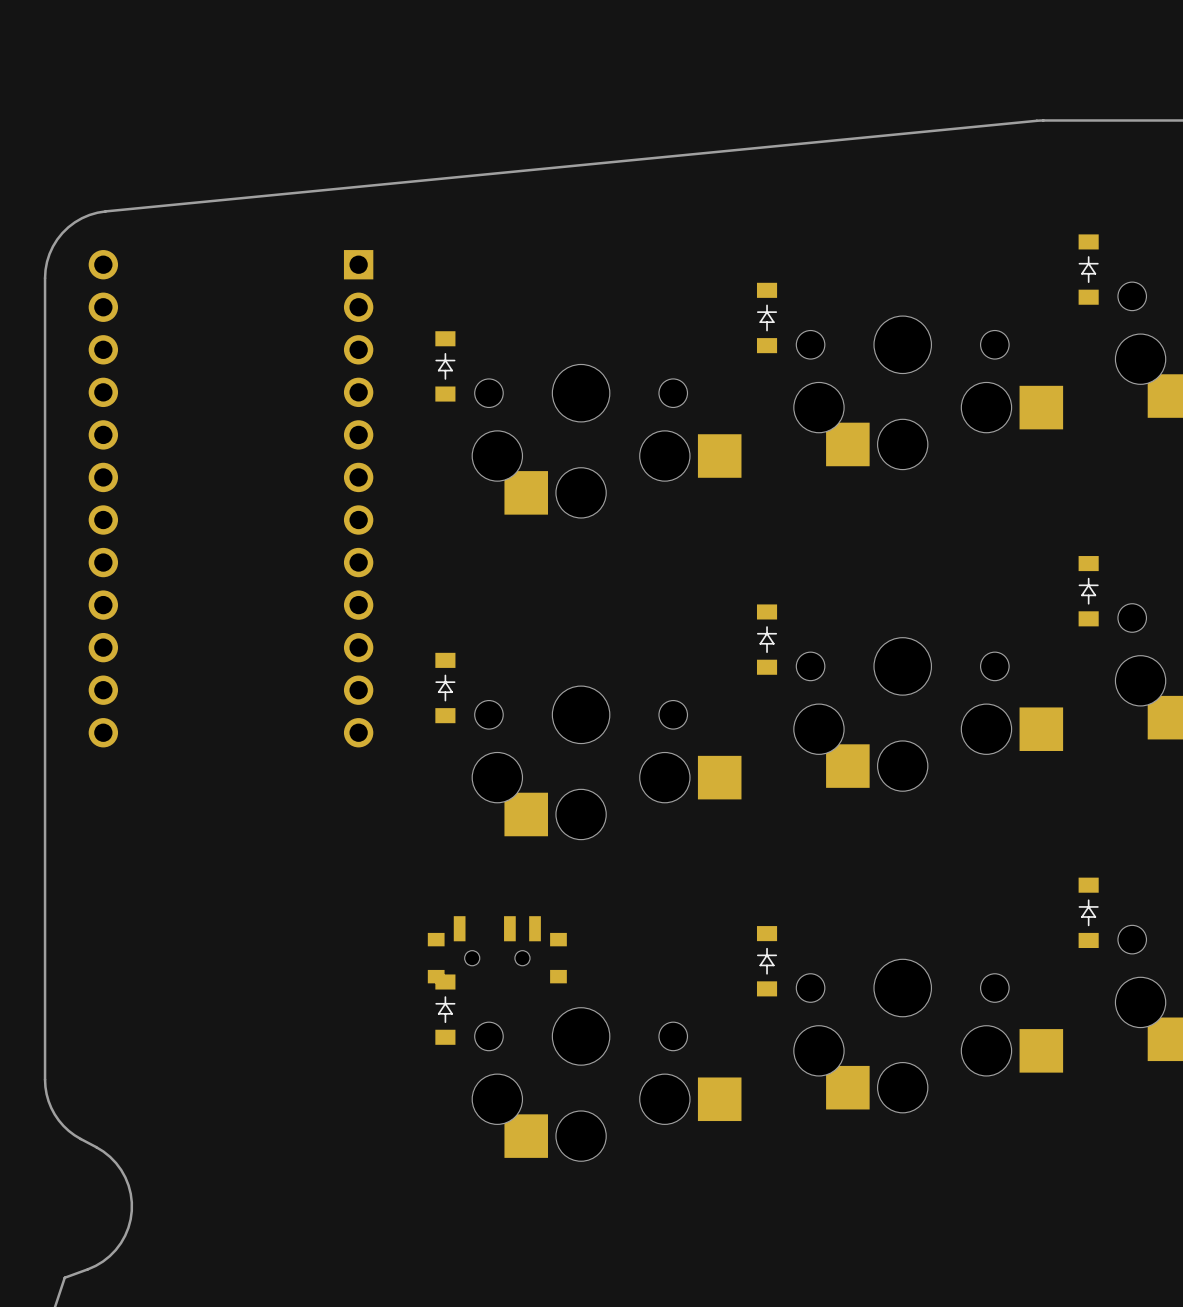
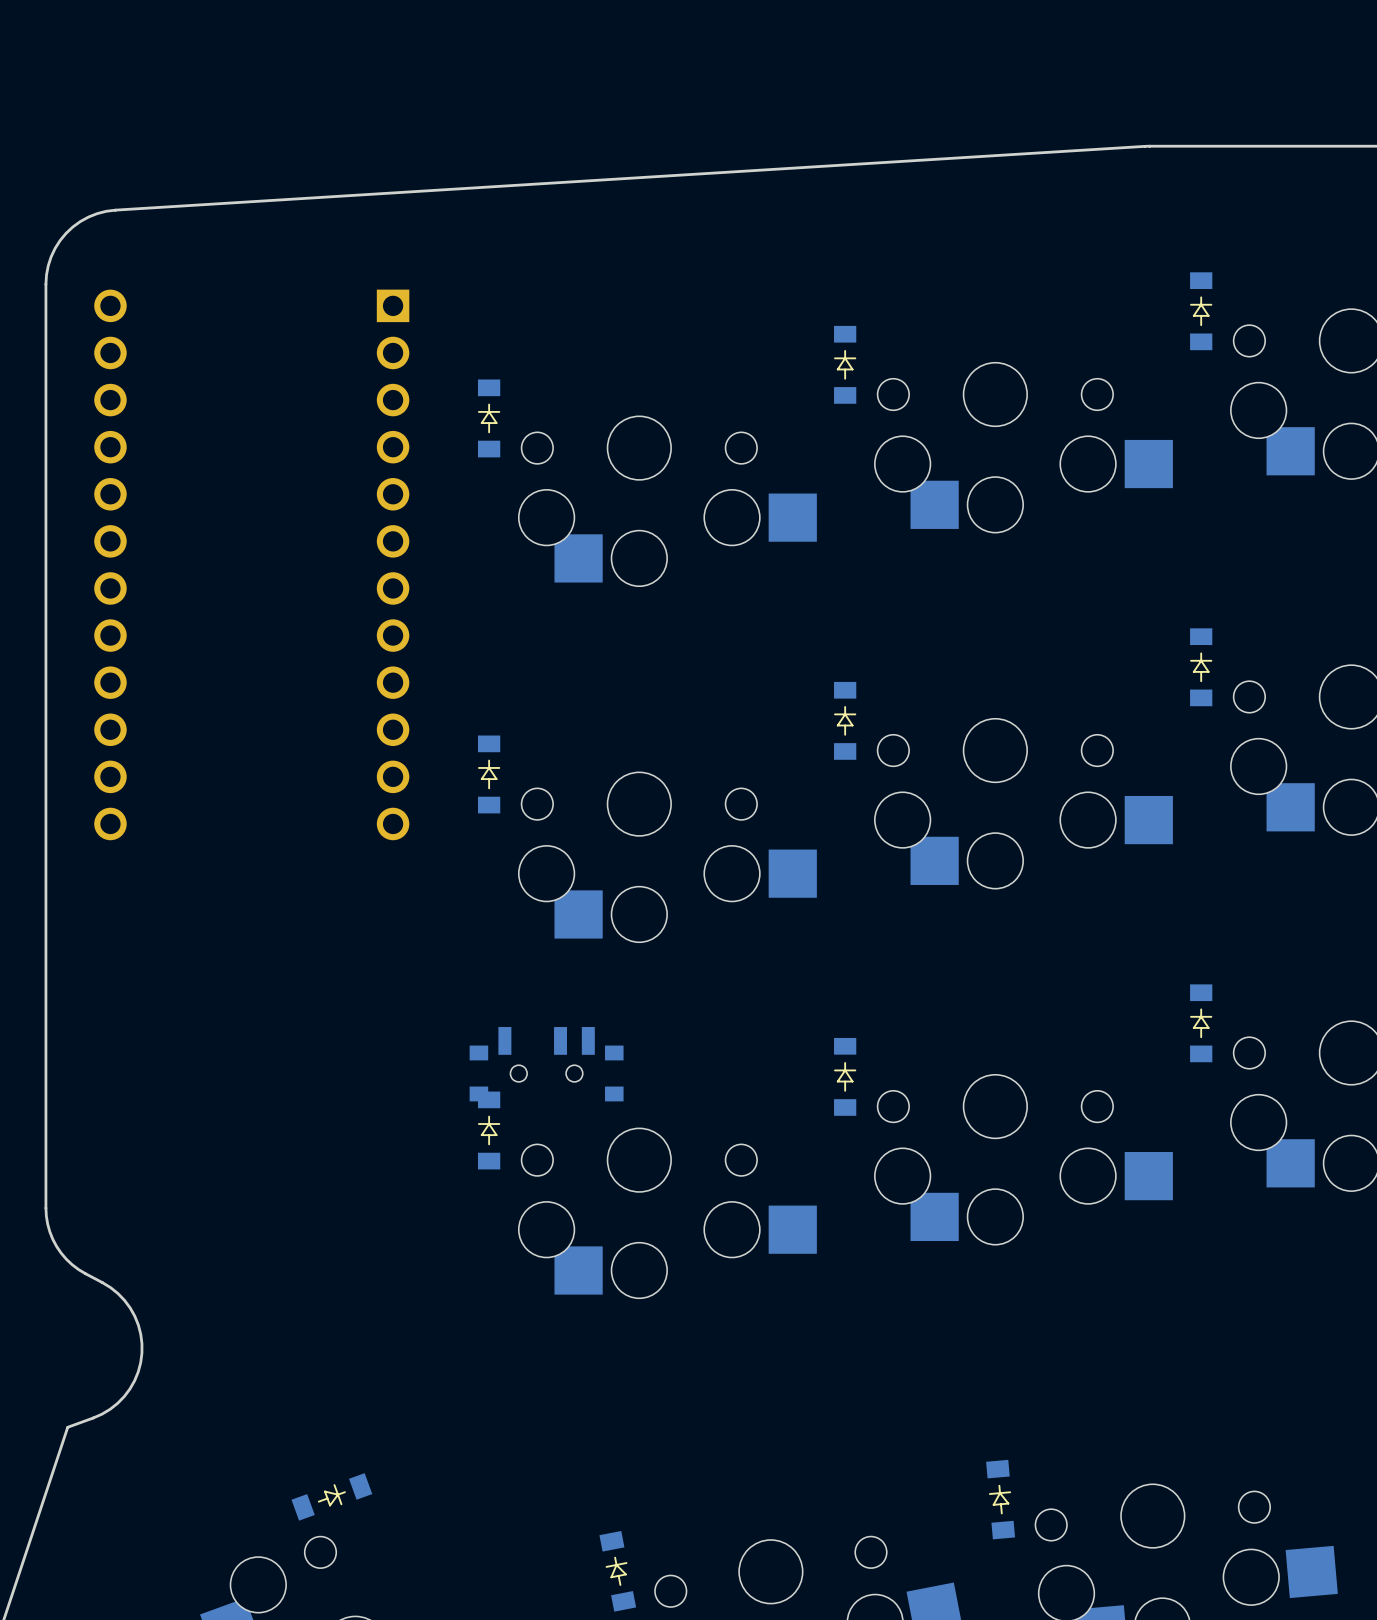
board edge: (1043, 120) (105, 211) (81, 218) (62, 233) (49, 253) (45, 278) -> (1151, 146) (106, 211) (80, 221) (66, 233) (55, 248) (46, 274) (45, 320)

